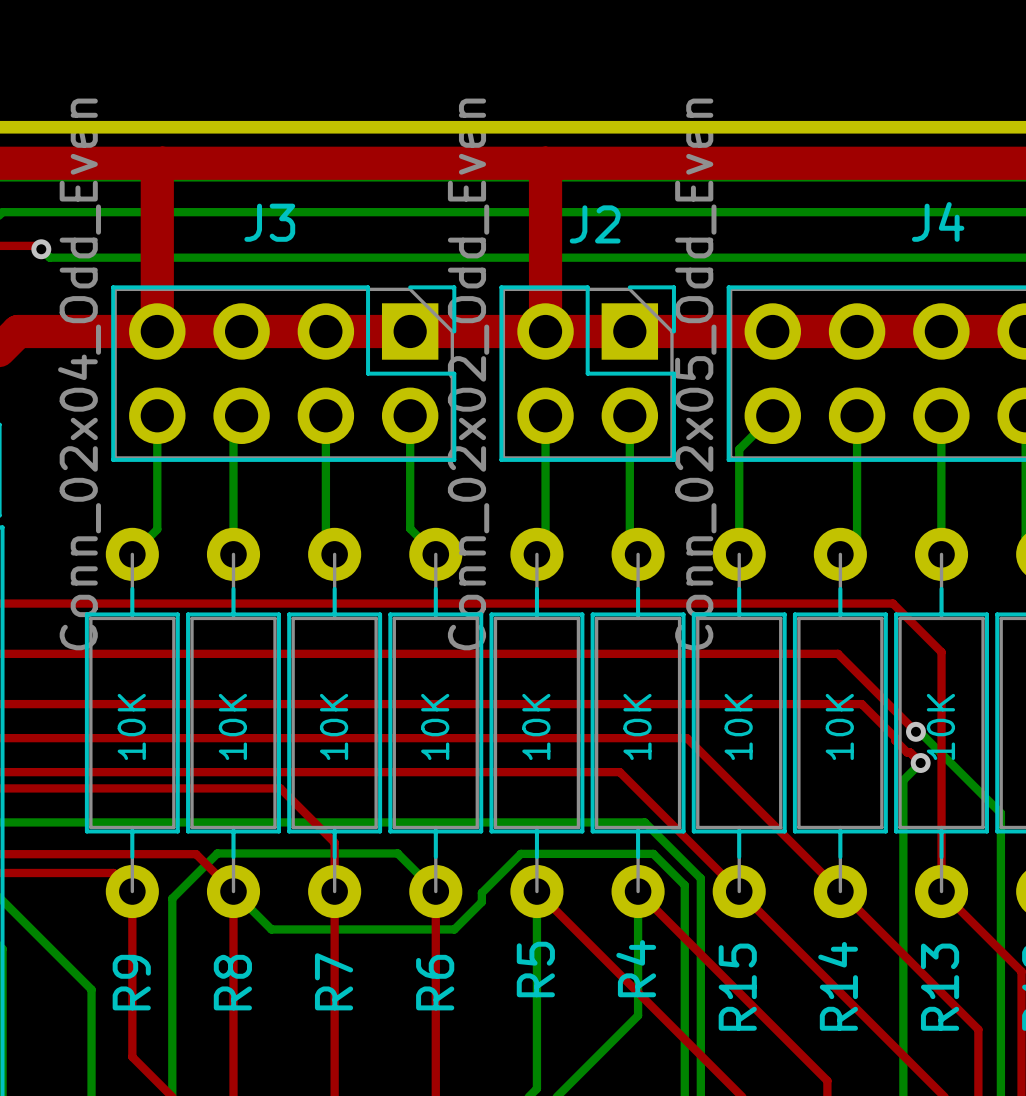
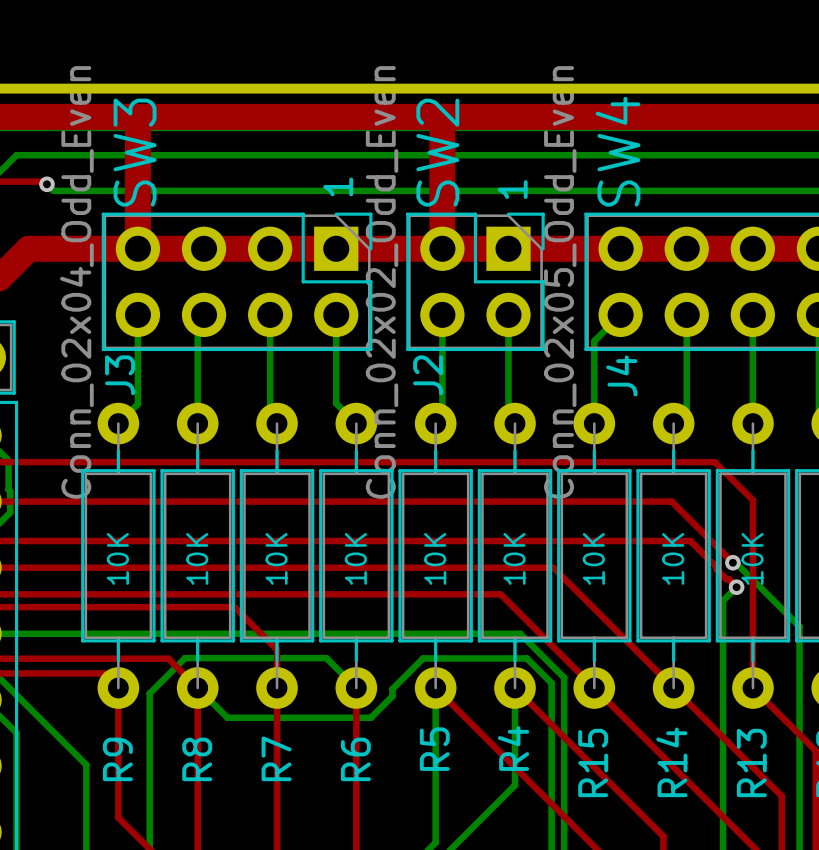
text: none -> SW4 (618, 151)
text: none -> SW3 (135, 152)
text: none -> SW2 (437, 152)
J4 name rotation: 0° (938, 221) -> 90° counterclockwise (621, 375)
J4 name position: J4 (938, 221) -> J4 (621, 375)
J3 name rotation: 0° (269, 222) -> 90° counterclockwise (120, 375)
J3 name position: J3 (269, 222) -> J3 (120, 375)
J2 name rotation: 0° (595, 224) -> 90° counterclockwise (428, 375)
J2 name position: J2 (595, 224) -> J2 (428, 375)
text: none -> 1 (338, 186)
text: none -> 1 (512, 189)

